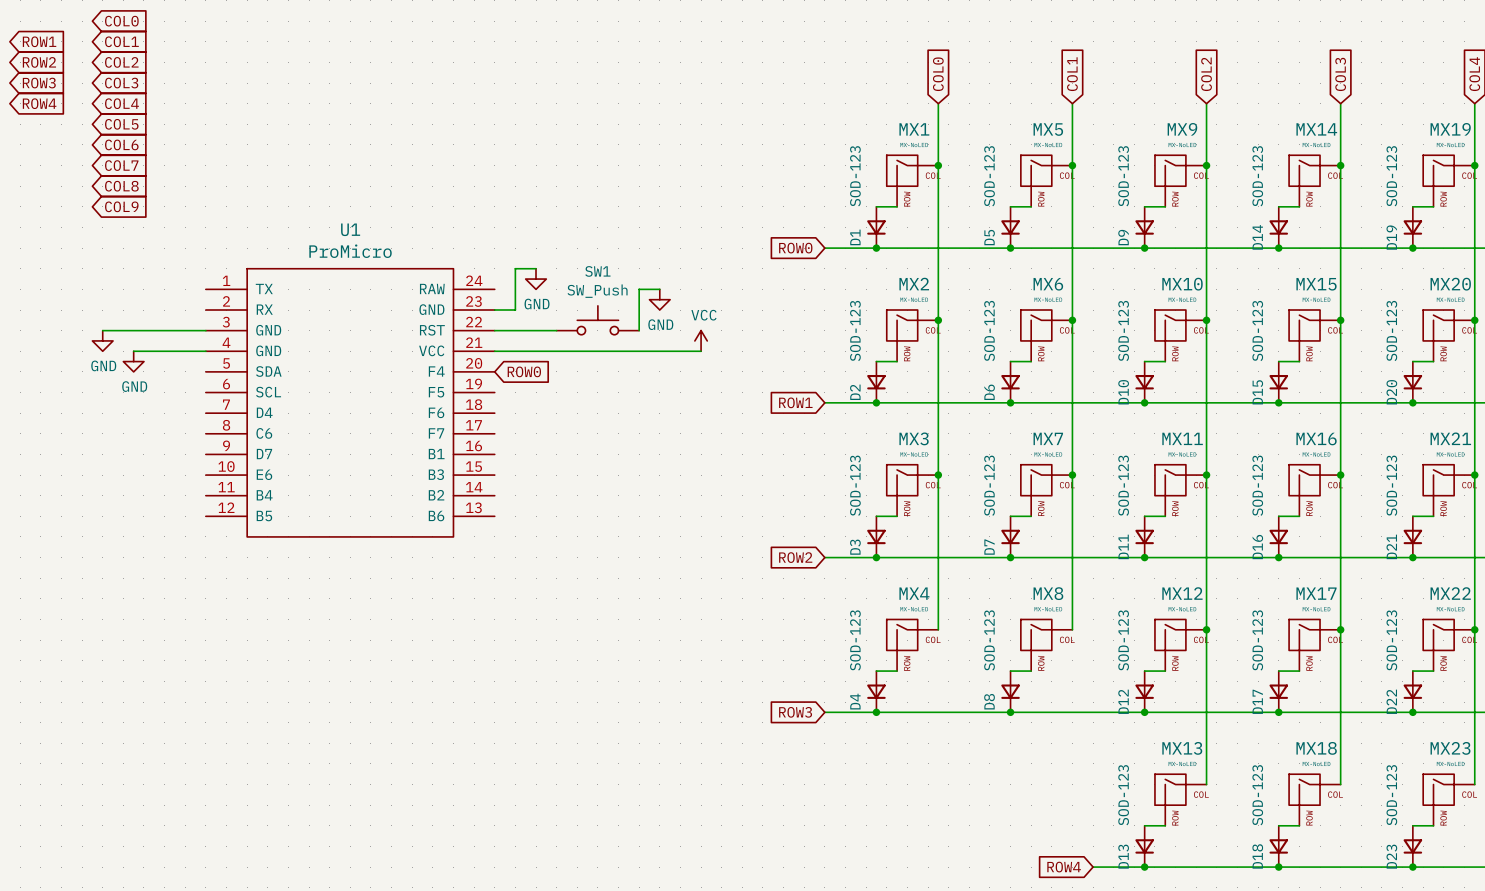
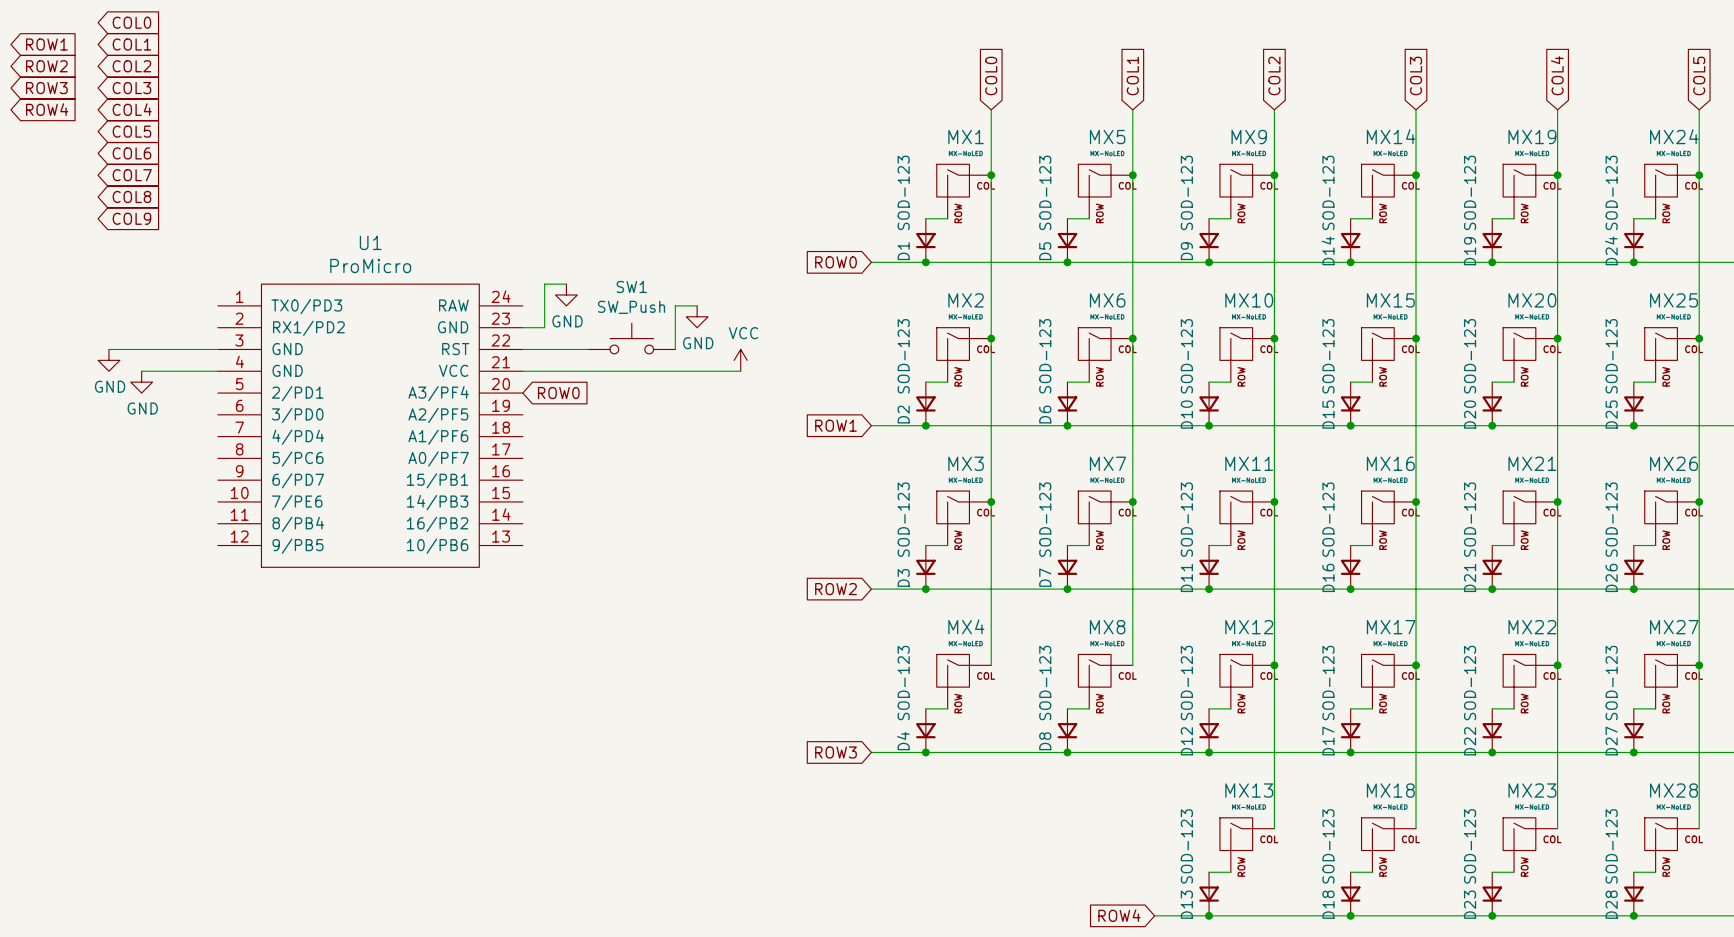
U1 symbol: [205, 268, 495, 537] -> [217, 284, 523, 568]

